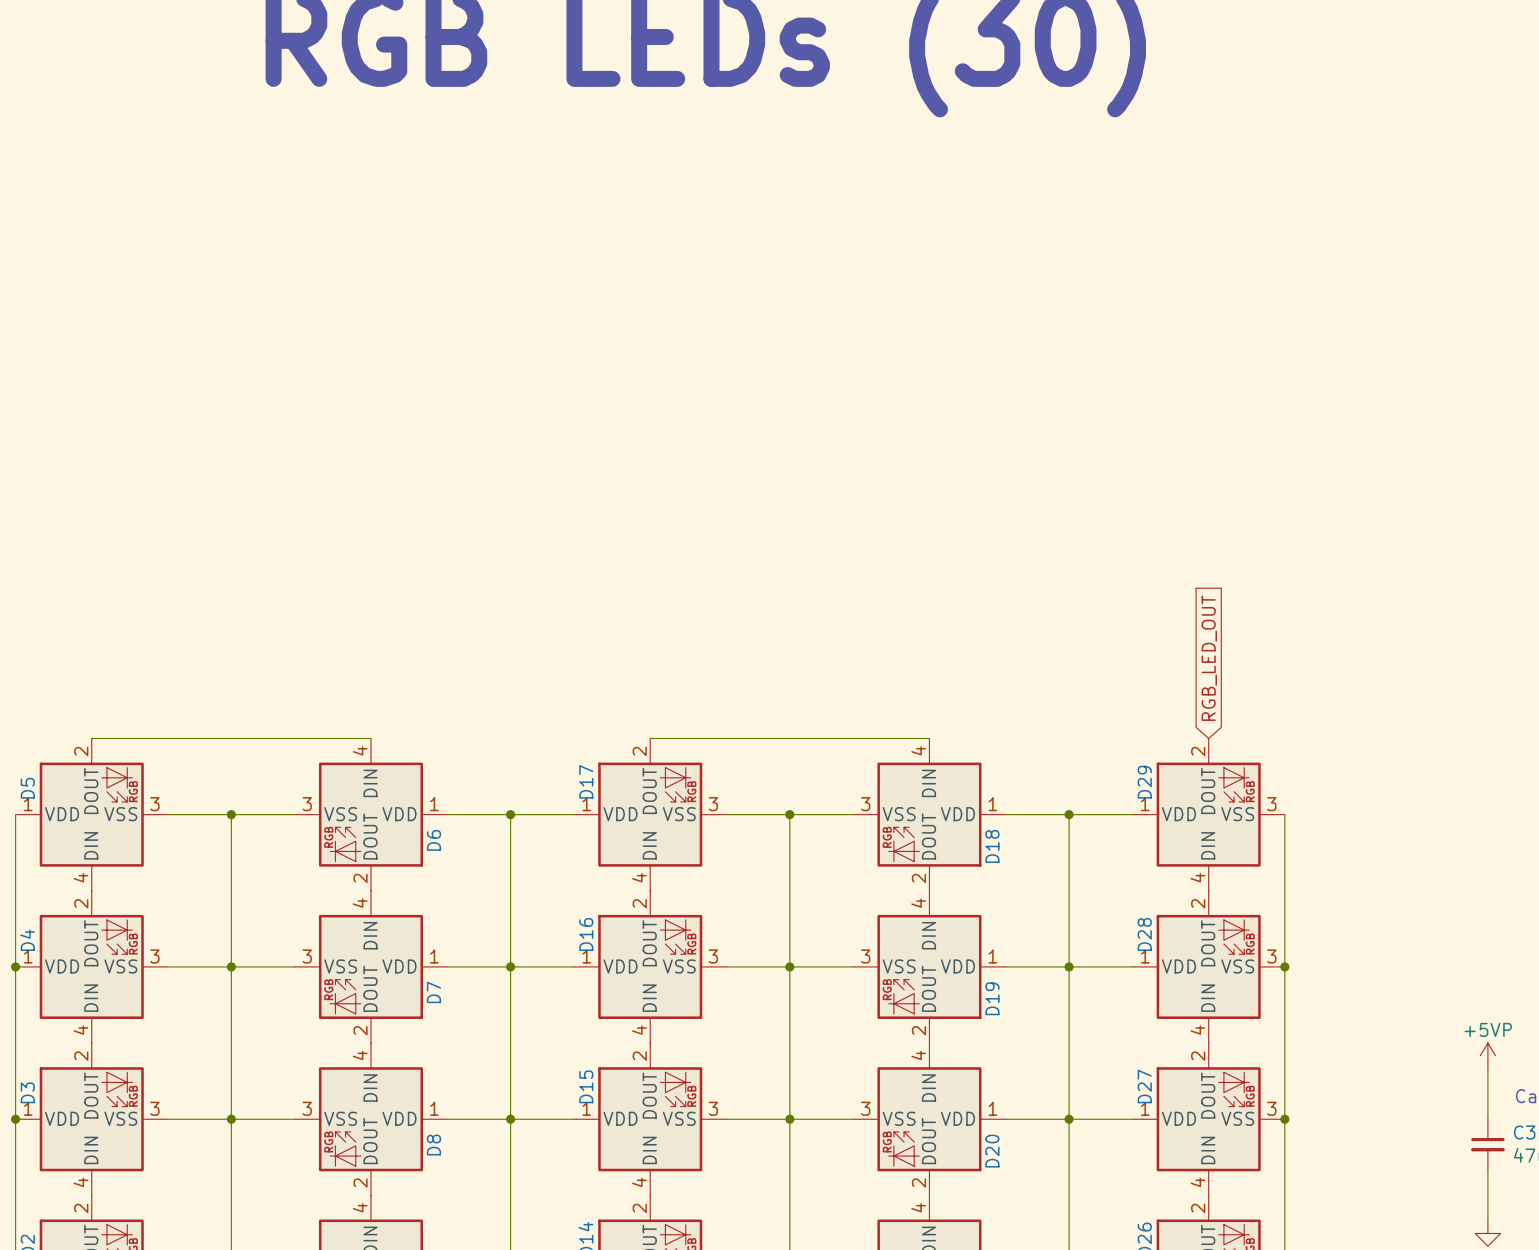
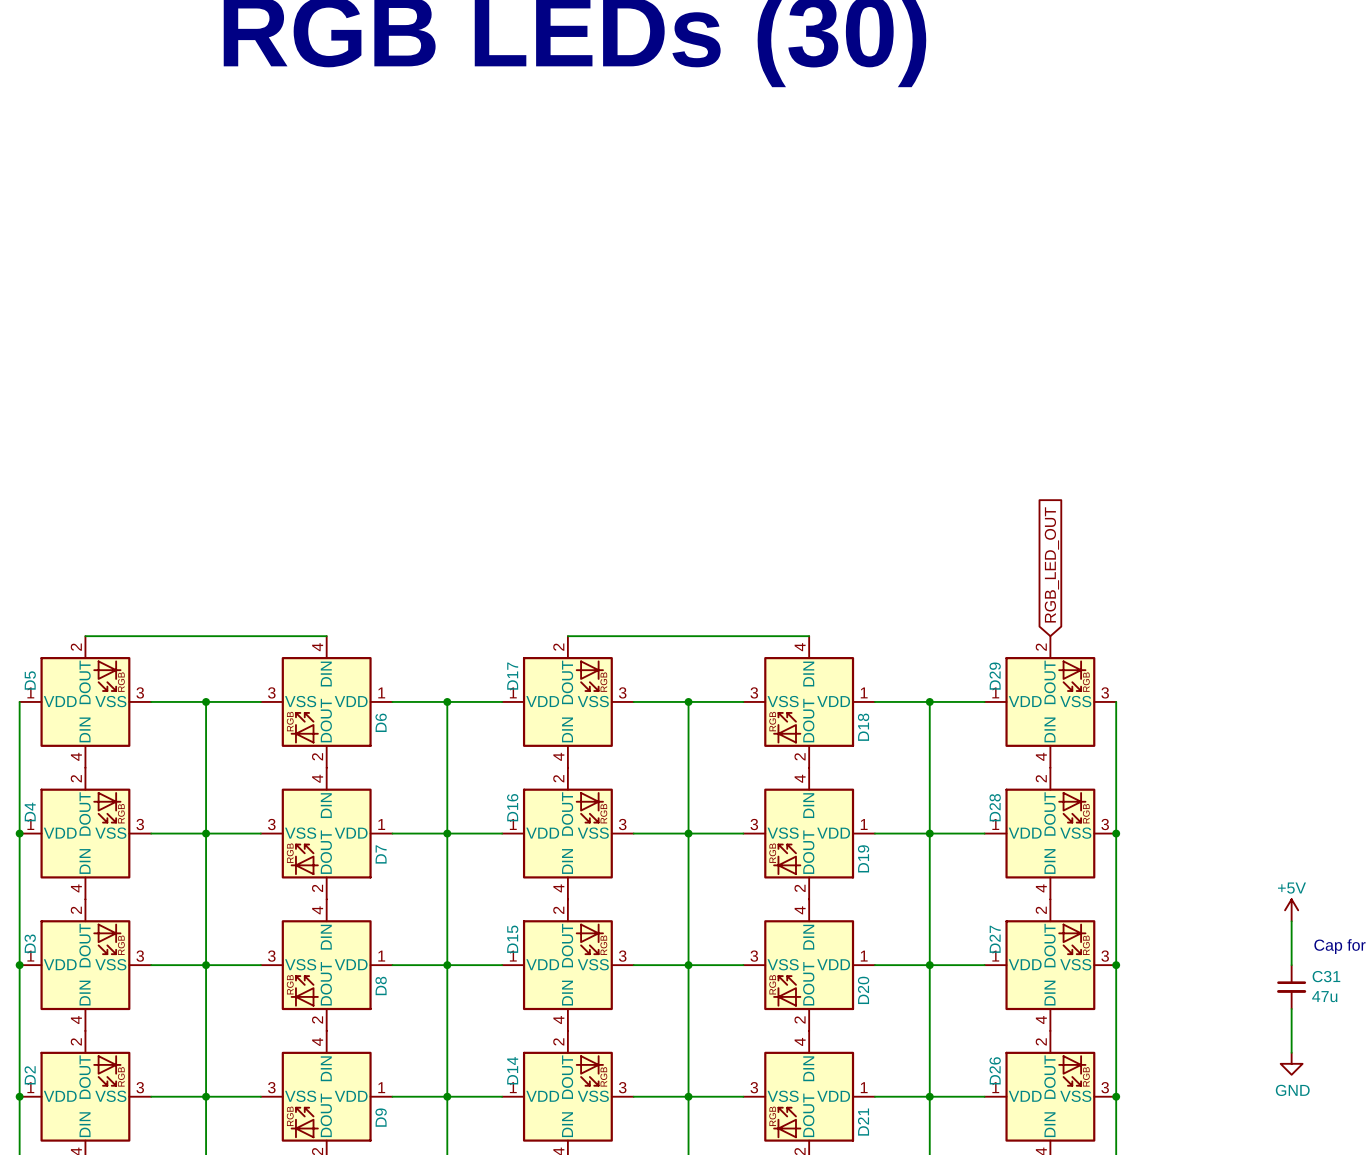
power symbol: +5VP (1487, 1055) -> +5V (1291, 910)

